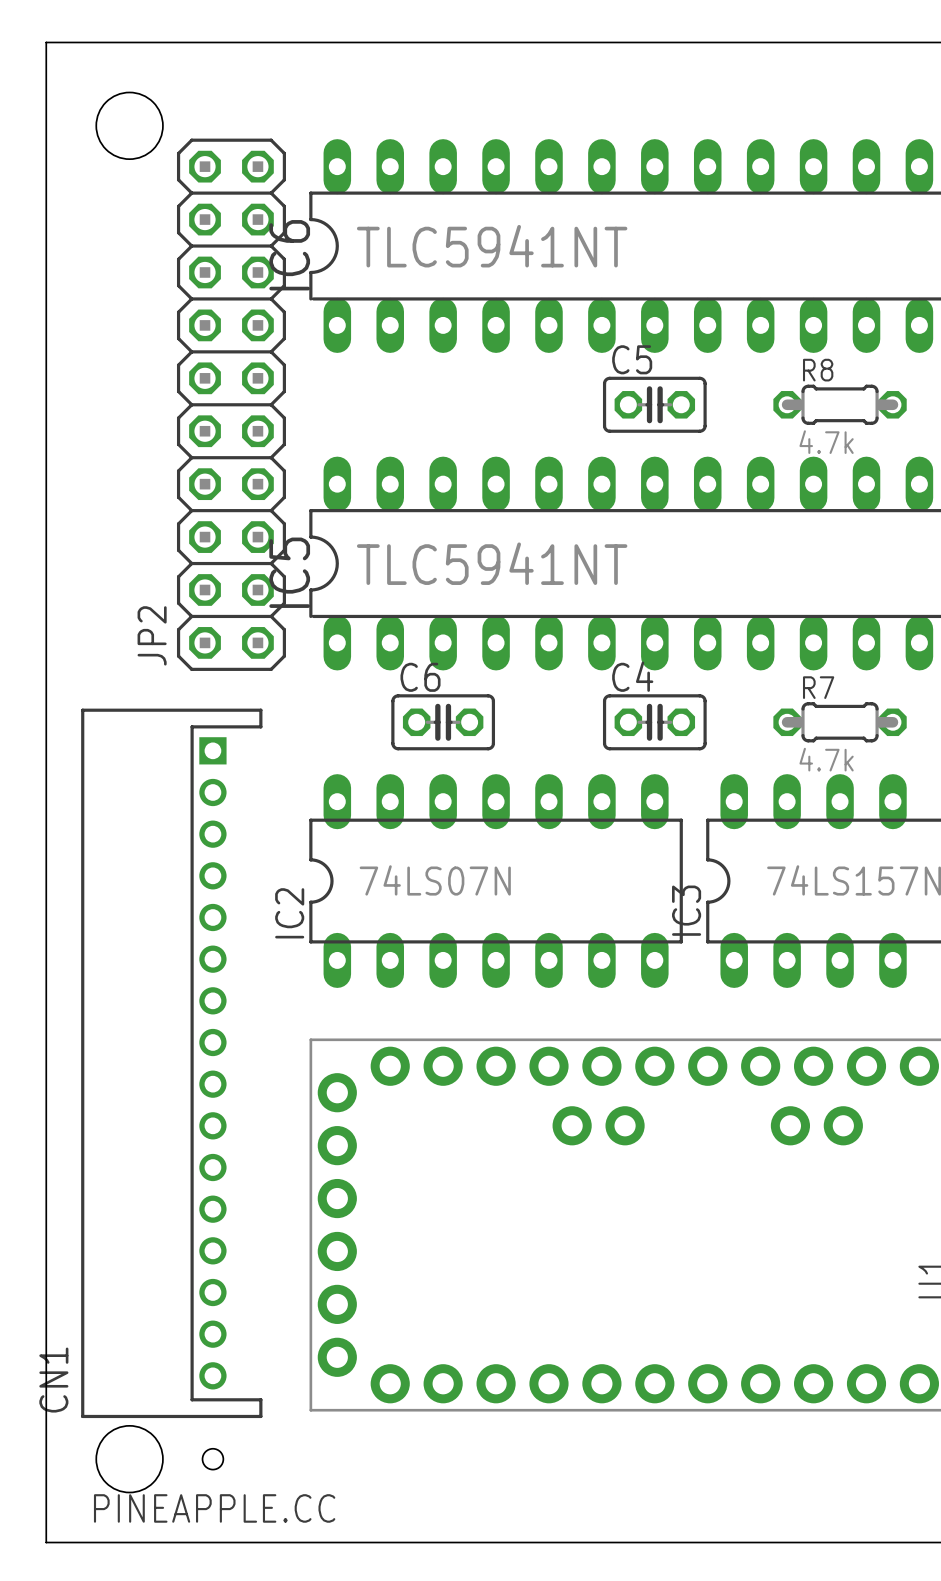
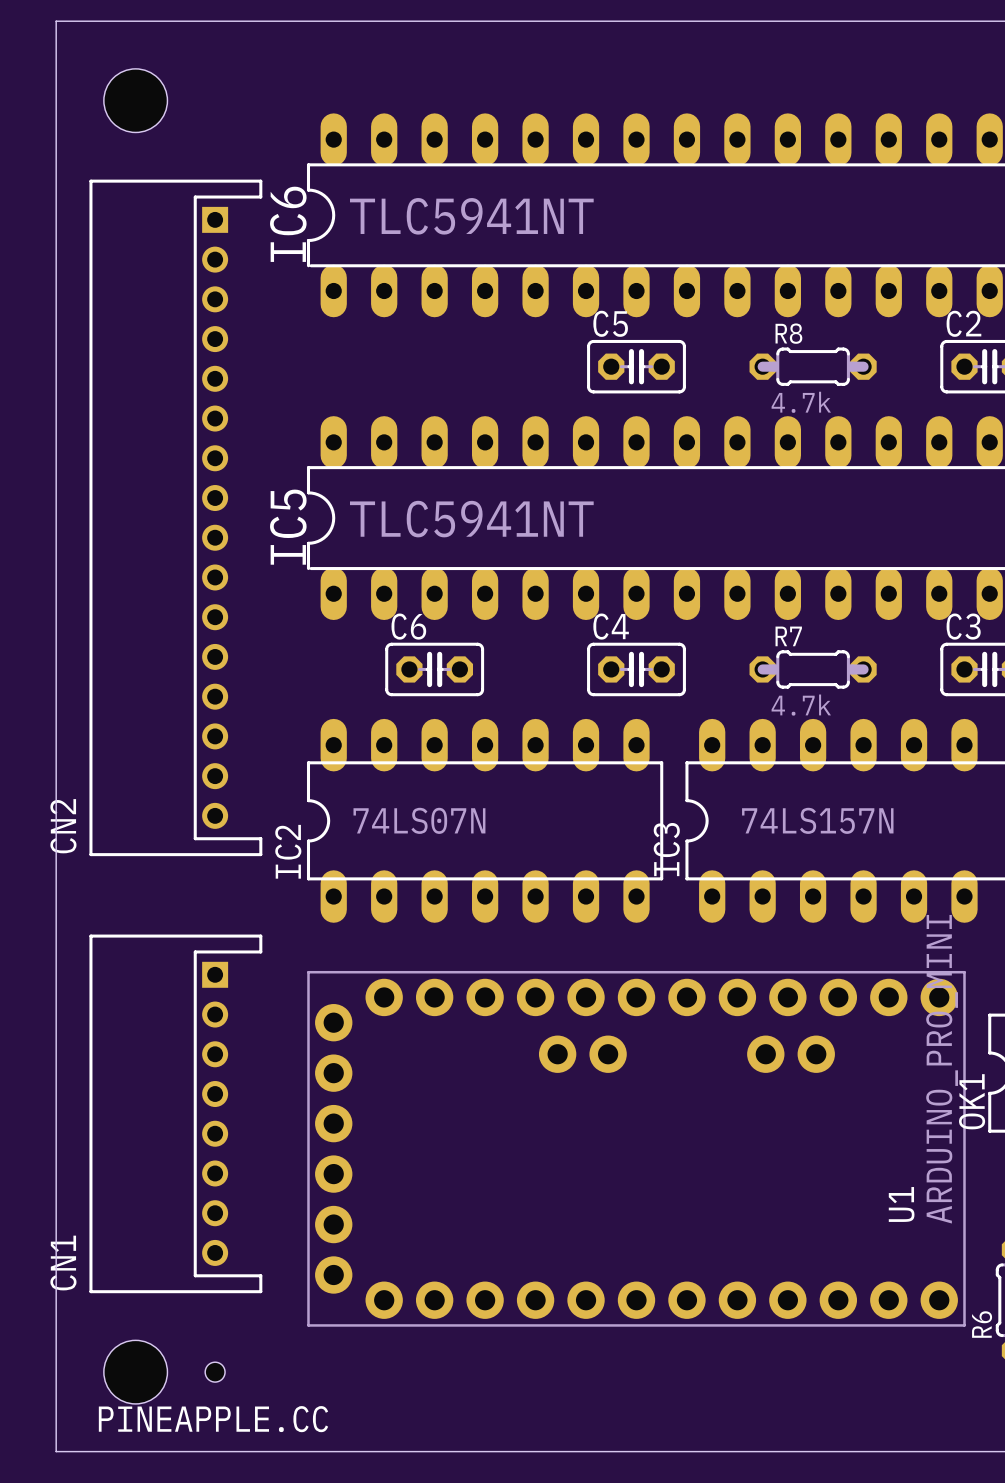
JP2: (231, 404) -> none
CN2: none -> (175, 517)
CN1 footprint: [81, 708, 263, 1419] -> [89, 934, 263, 1294]
CN1 name position: CN1 (53, 1380) -> CN1 (63, 1263)

